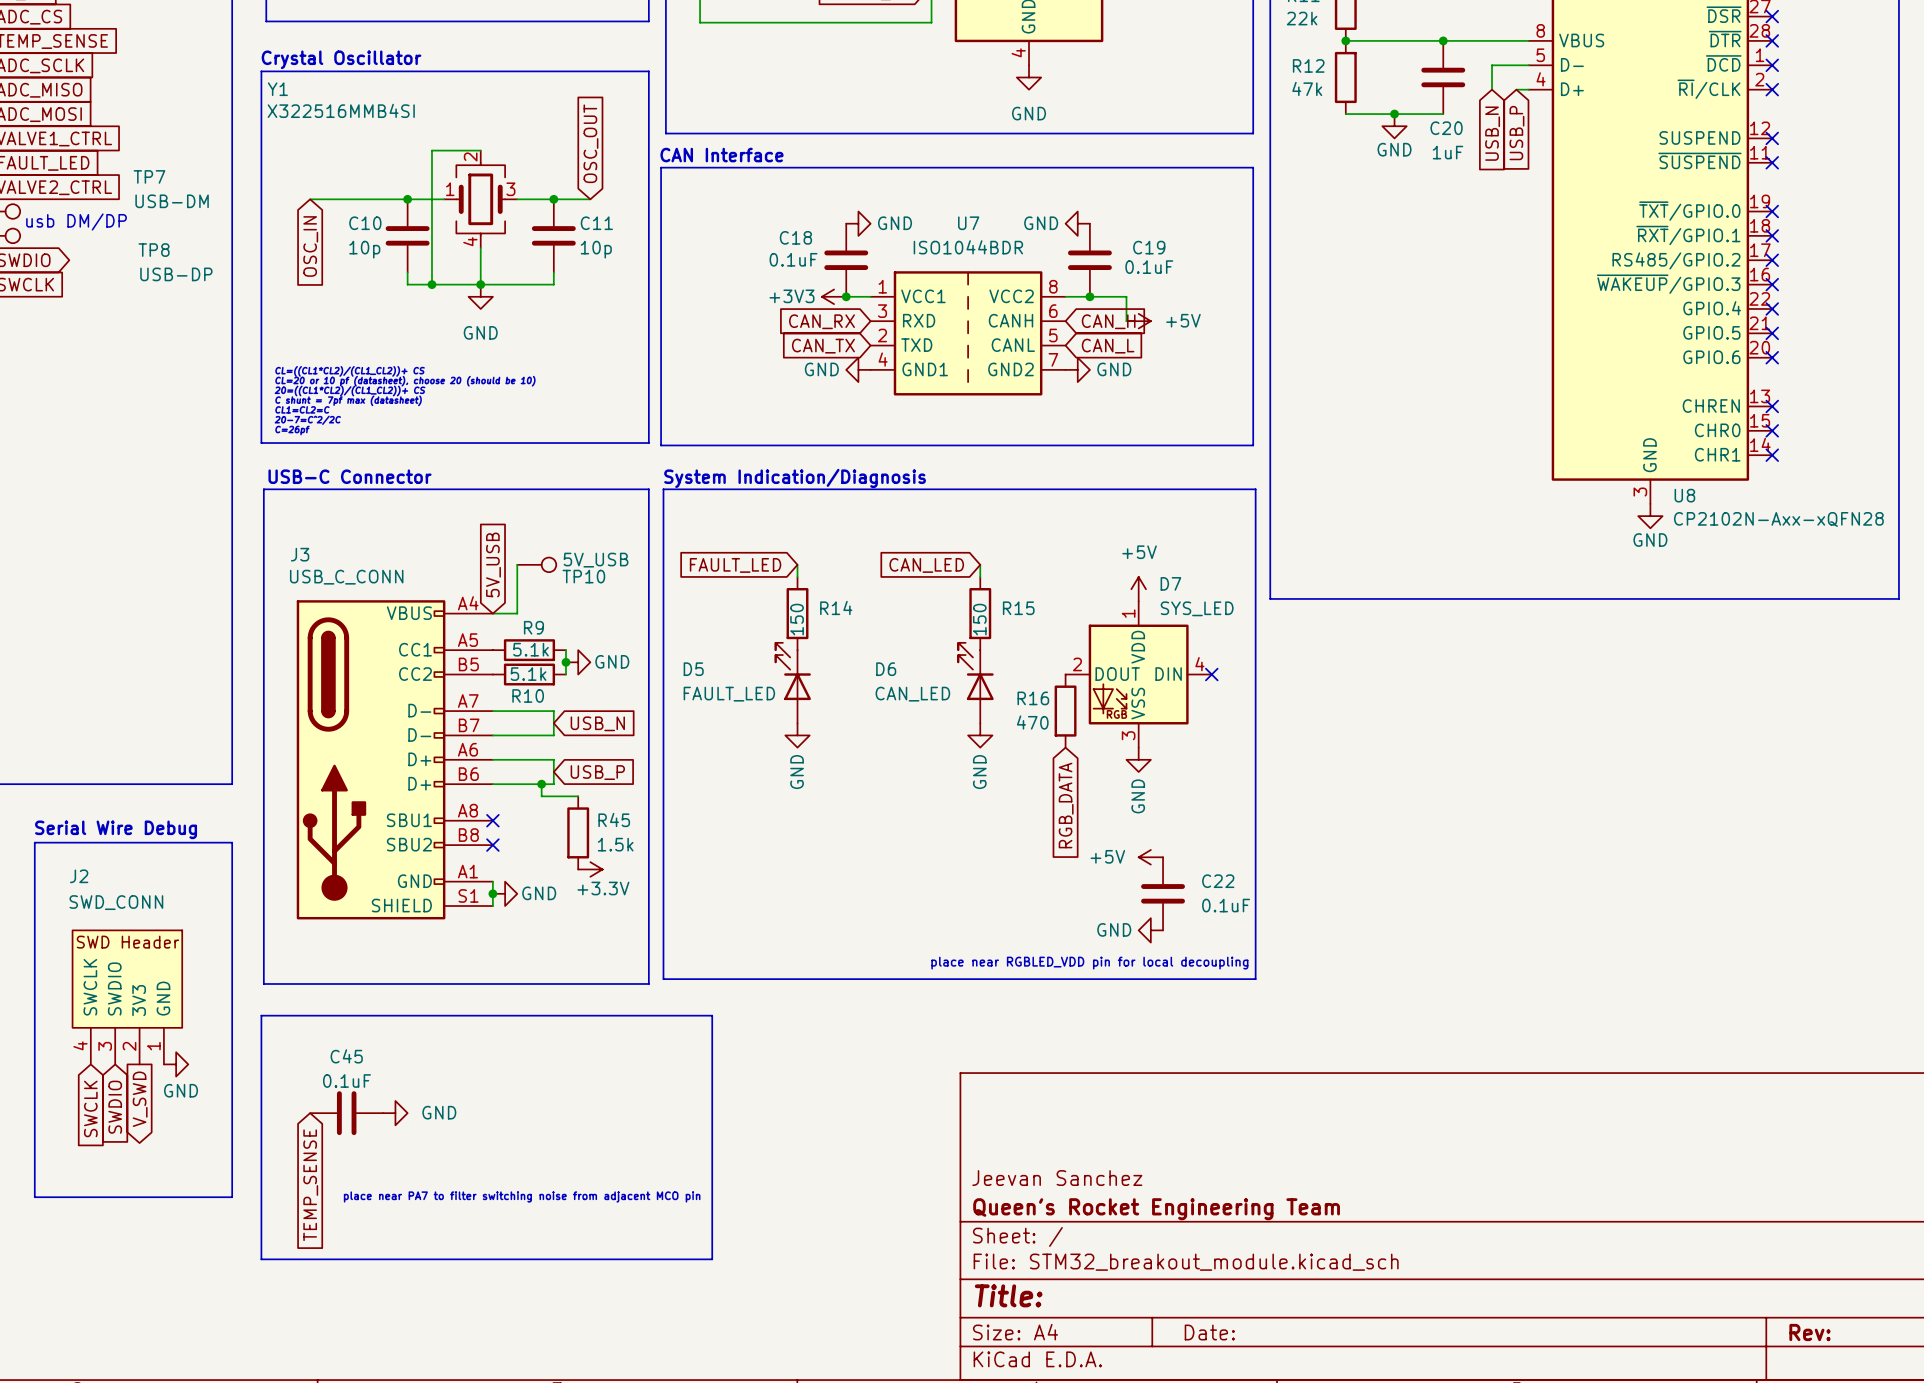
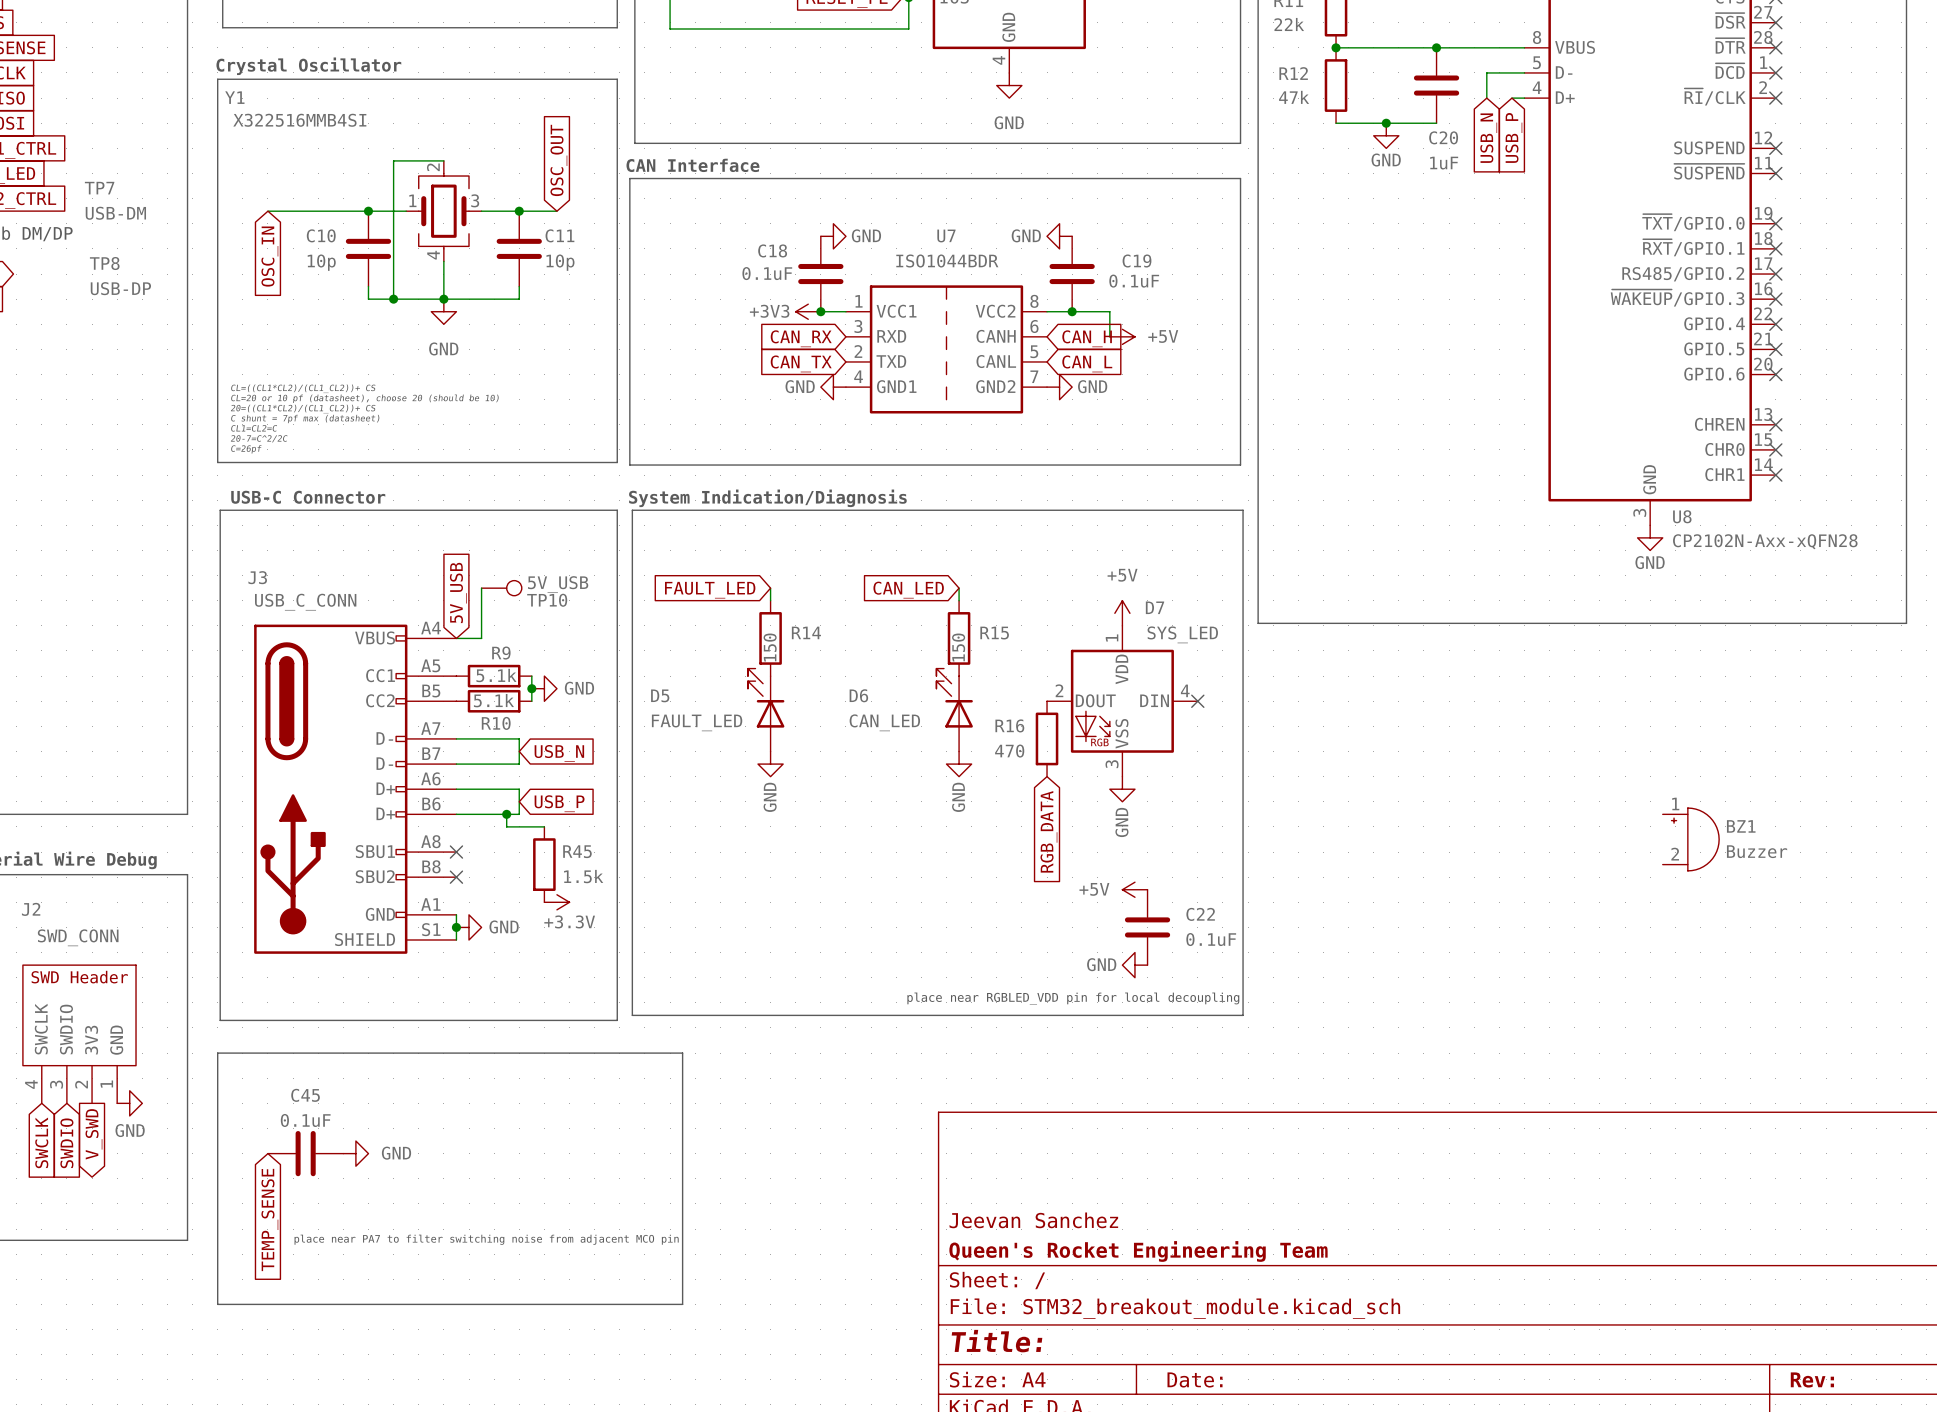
BZ1: none -> Buzzer (1690, 839)

